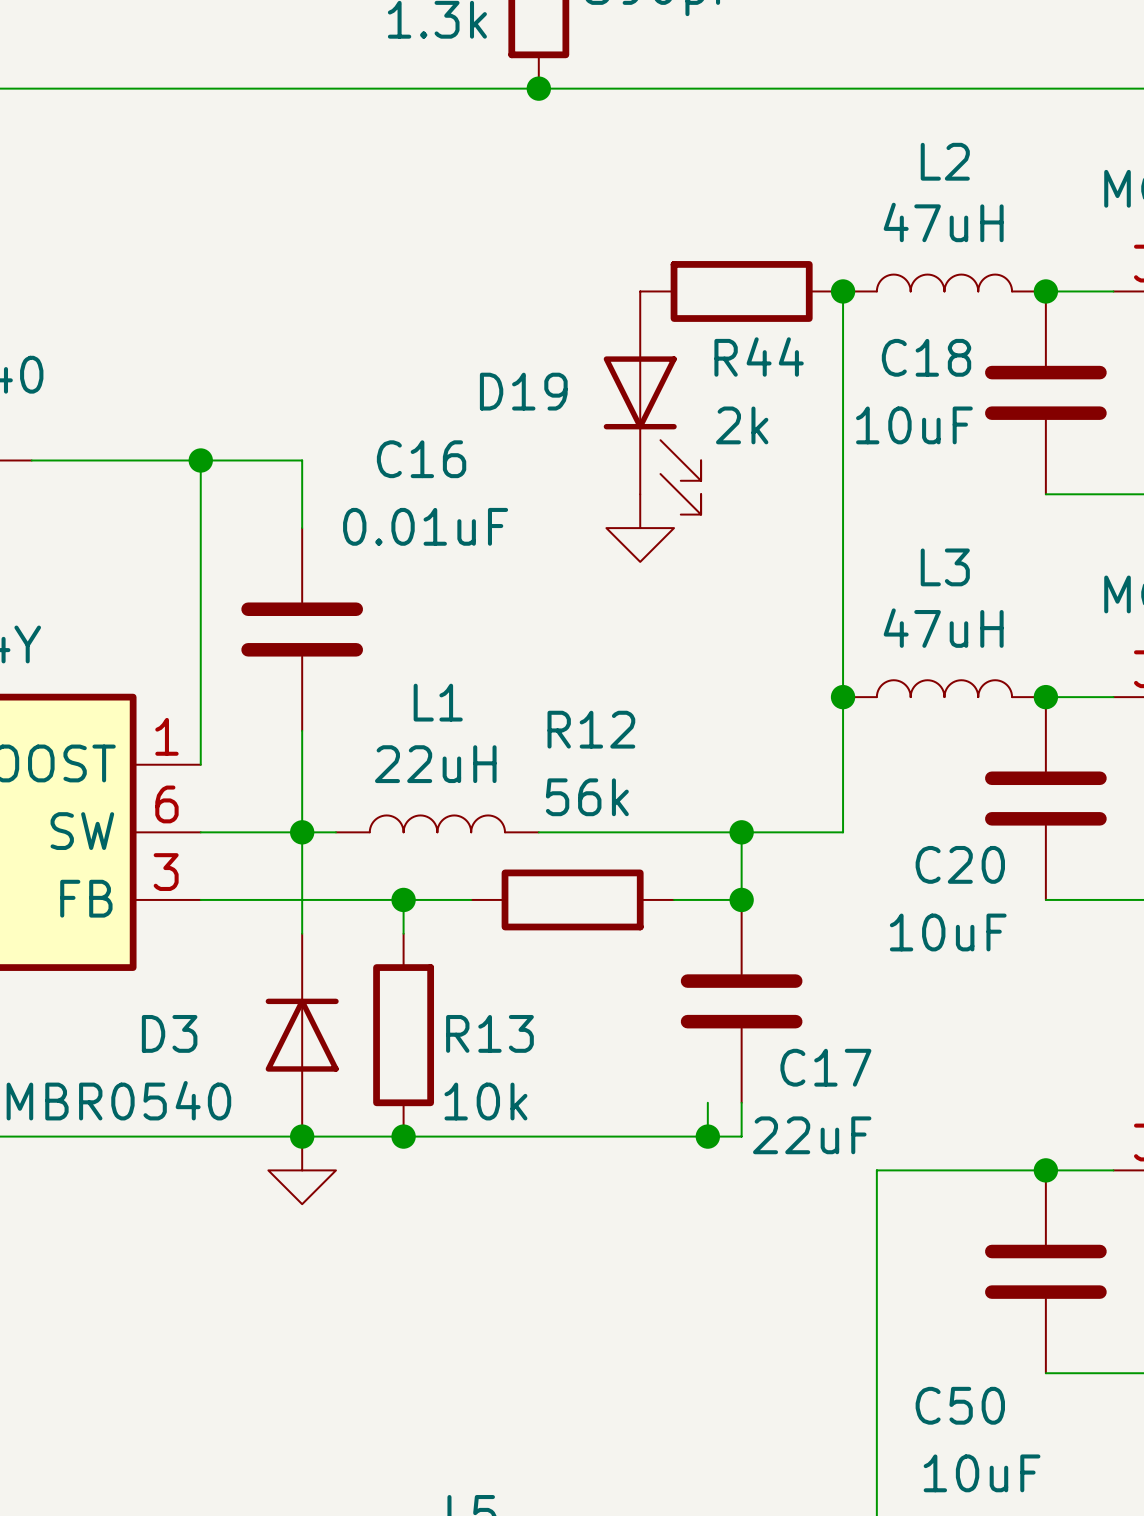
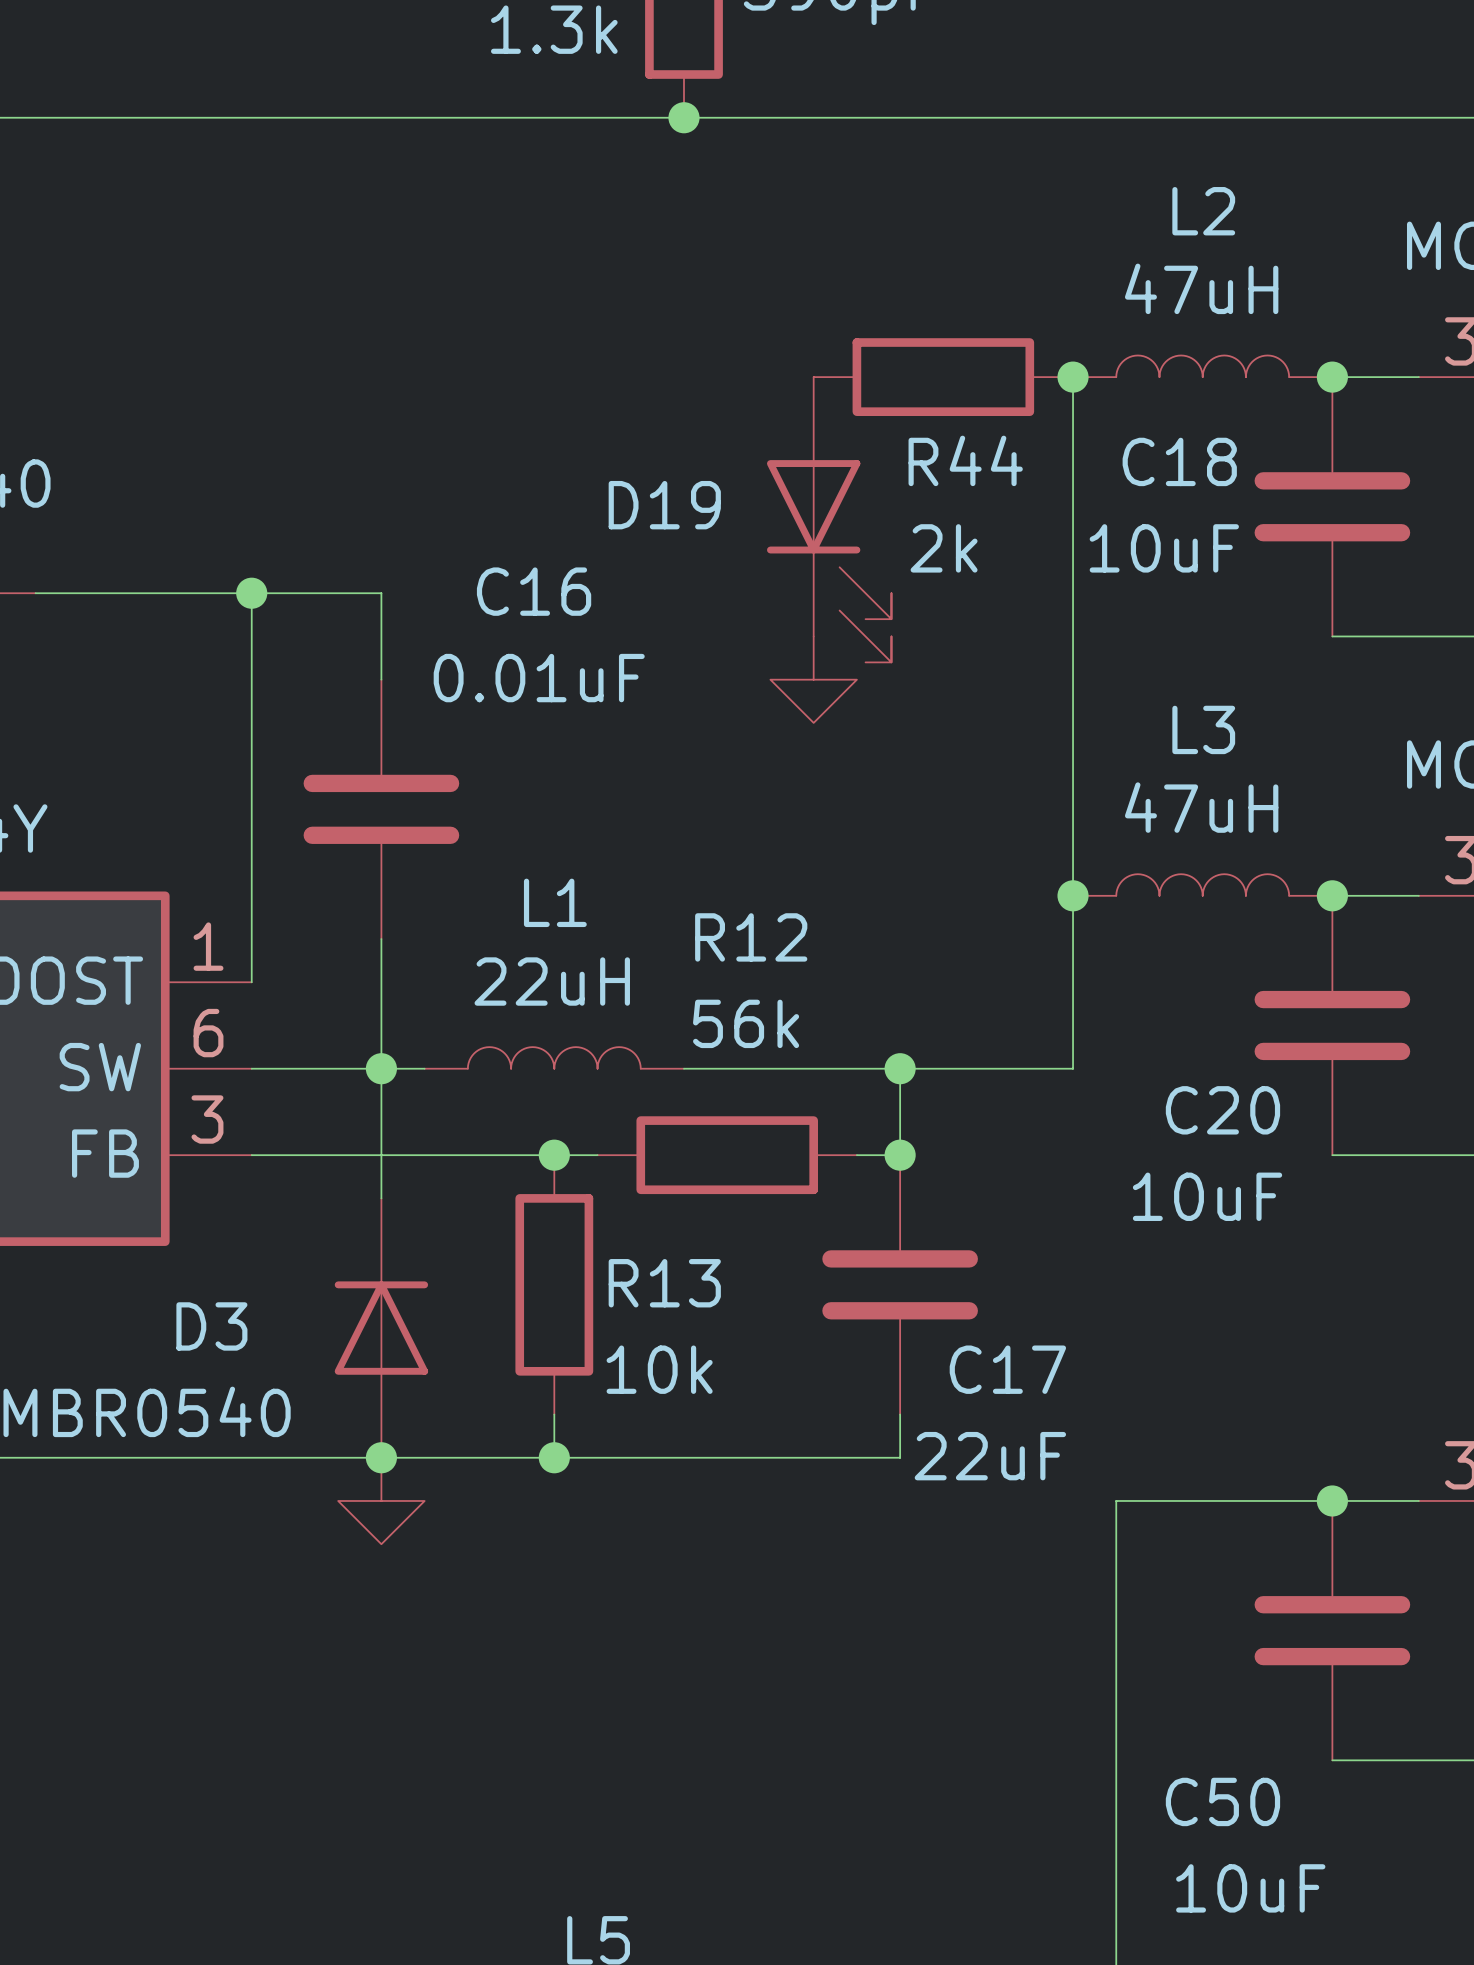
wire: (741, 832) (741, 899) (707, 899) -> (900, 1068) (900, 1155)
junction position: (741, 832) -> (900, 1068)
wire: (403, 899) (403, 933) -> (554, 1414) (554, 1457)
junction position: (403, 899) -> (554, 1155)
junction position: (741, 899) -> (900, 1155)
C17 position: (741, 1001) -> (900, 1284)
R13 position: (403, 1035) -> (554, 1284)
wire: (741, 1102) (741, 1136) (707, 1136) -> none
junction position: (403, 1136) -> (554, 1457)
junction: (707, 1136) -> none

